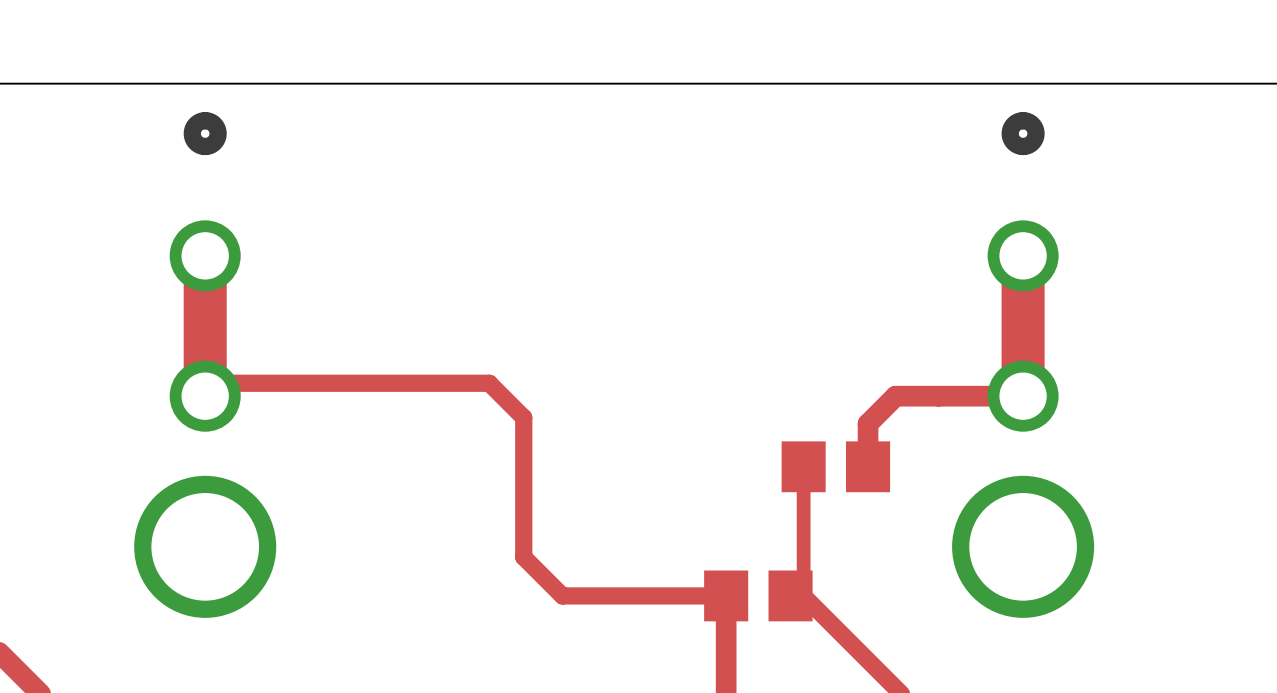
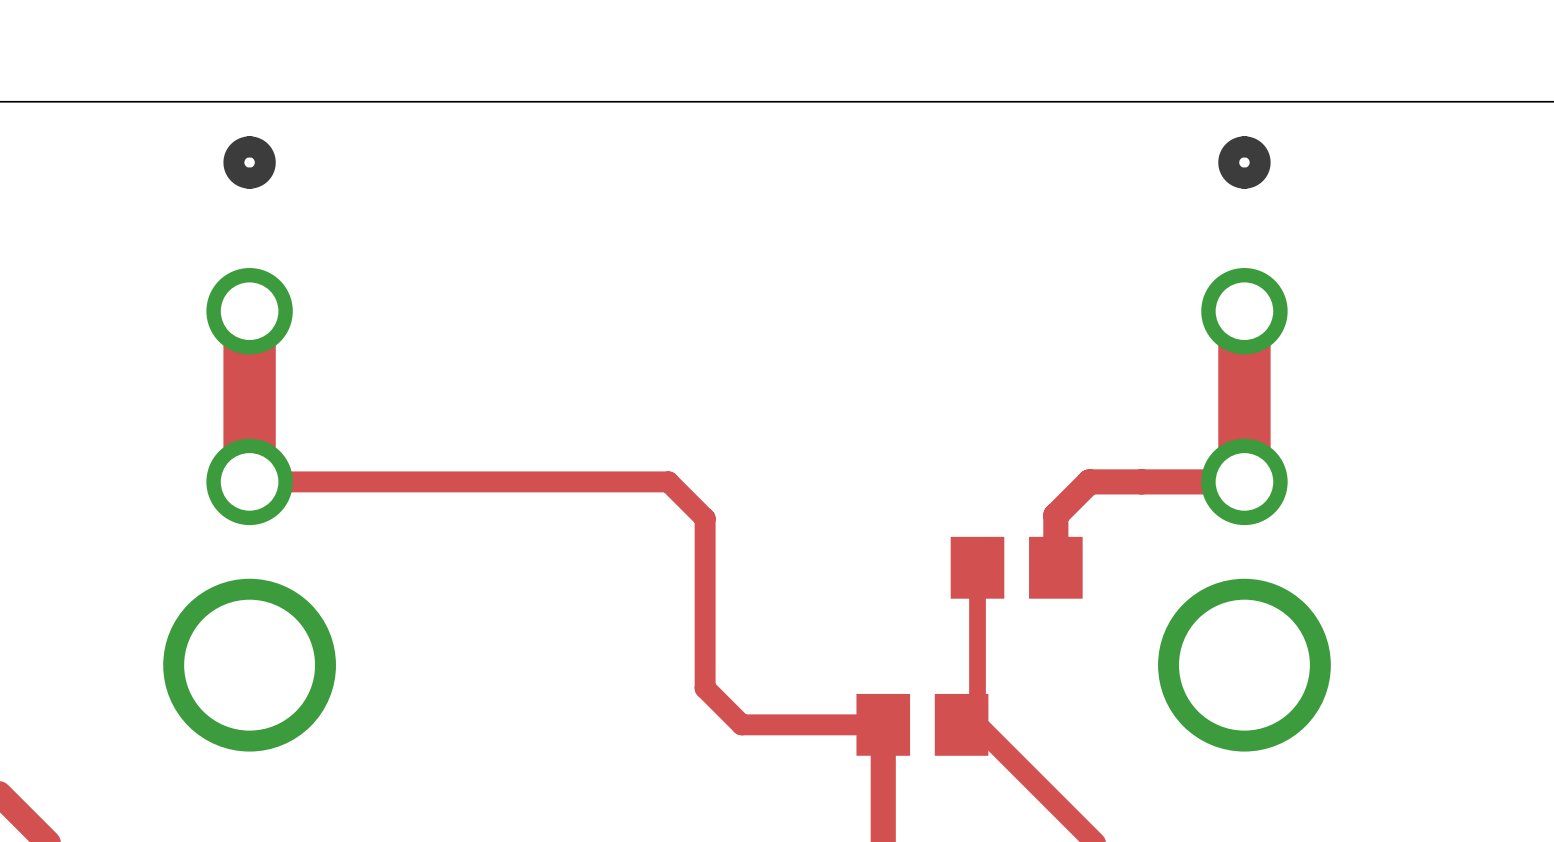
top track: (205, 396) (218, 383) (489, 383) (523, 417) (523, 557) (562, 595) (609, 595) -> (249, 481) (668, 481) (705, 518) (705, 688) (741, 724)

